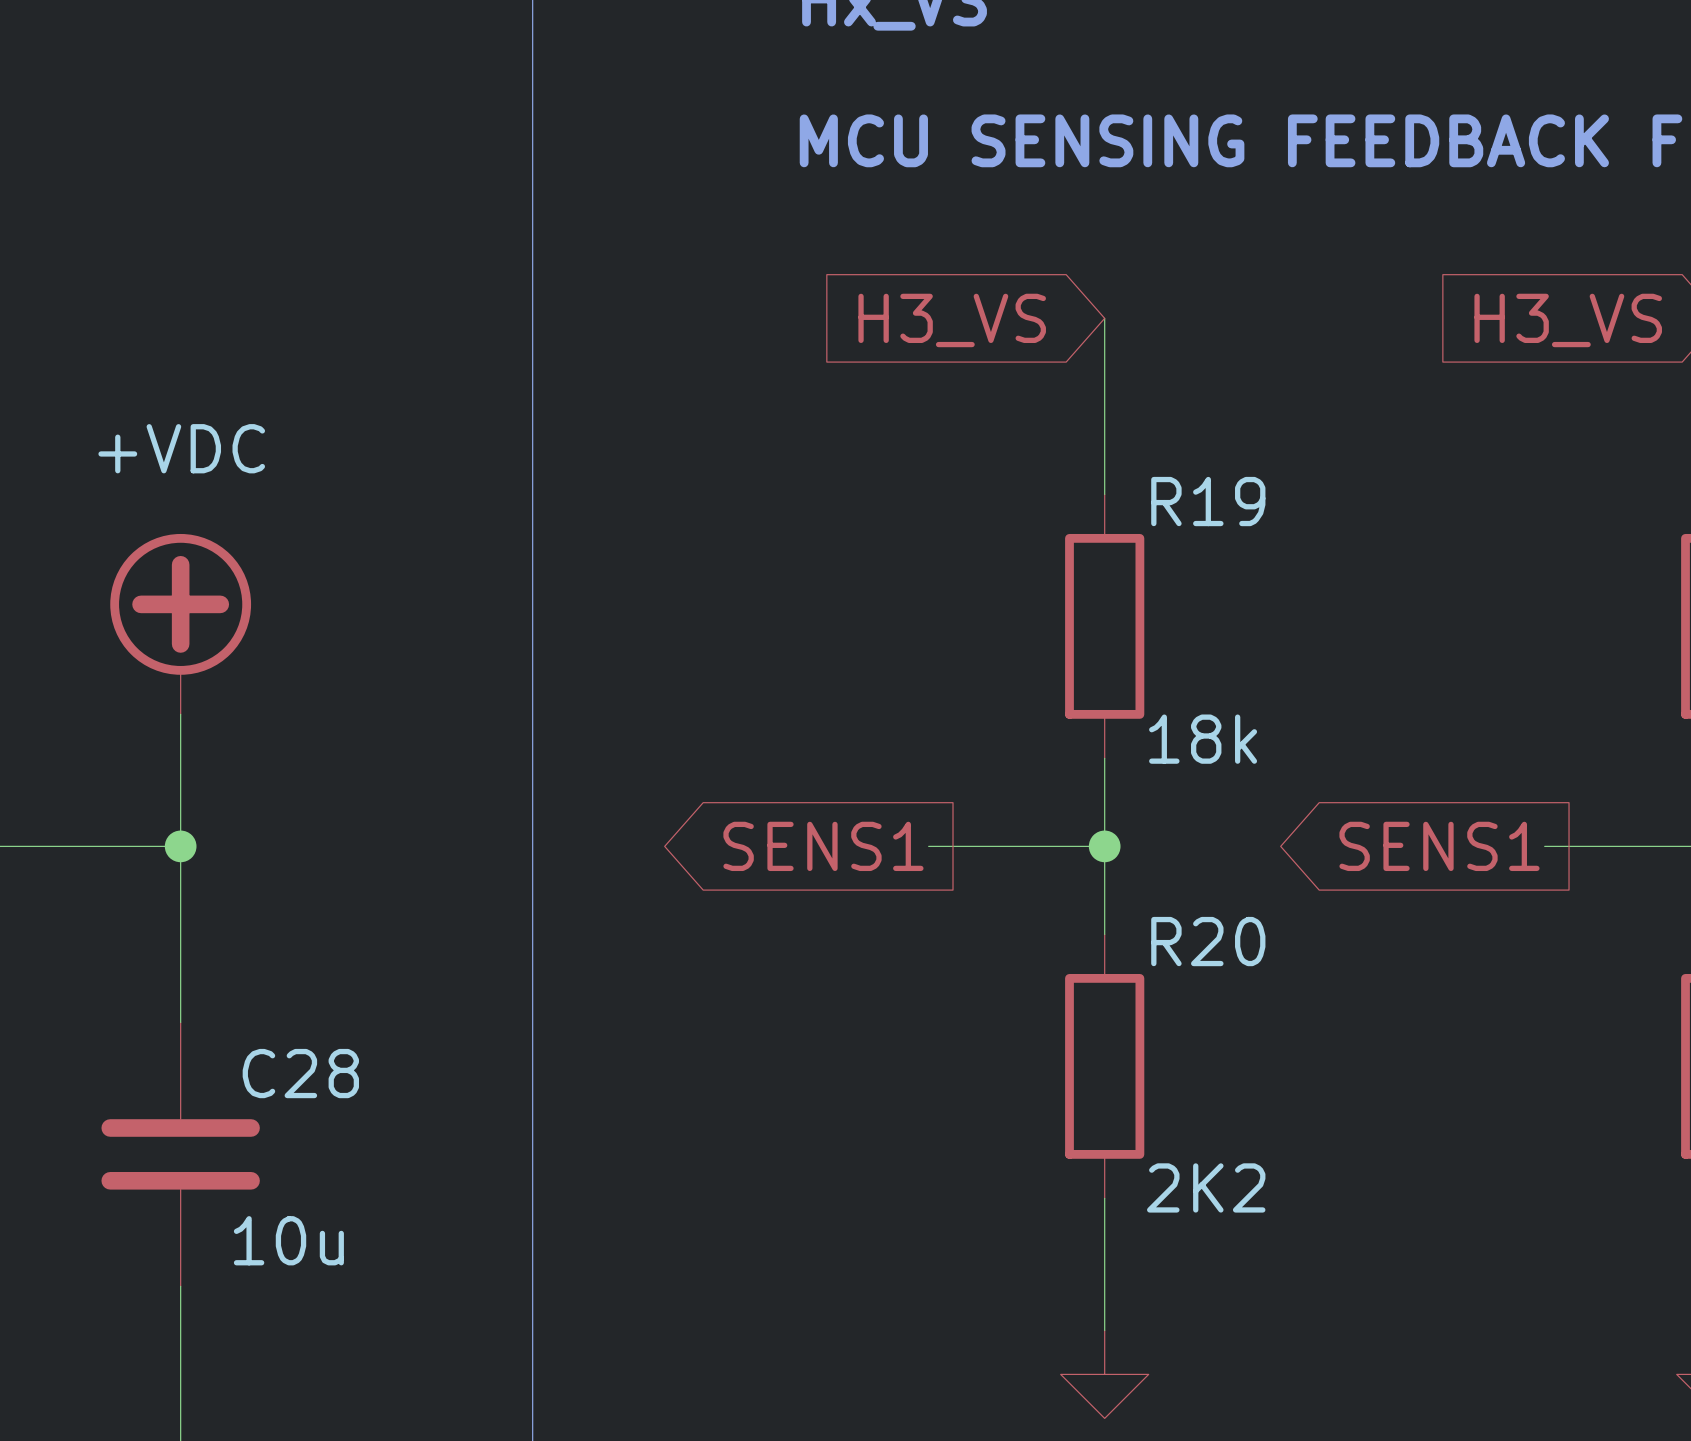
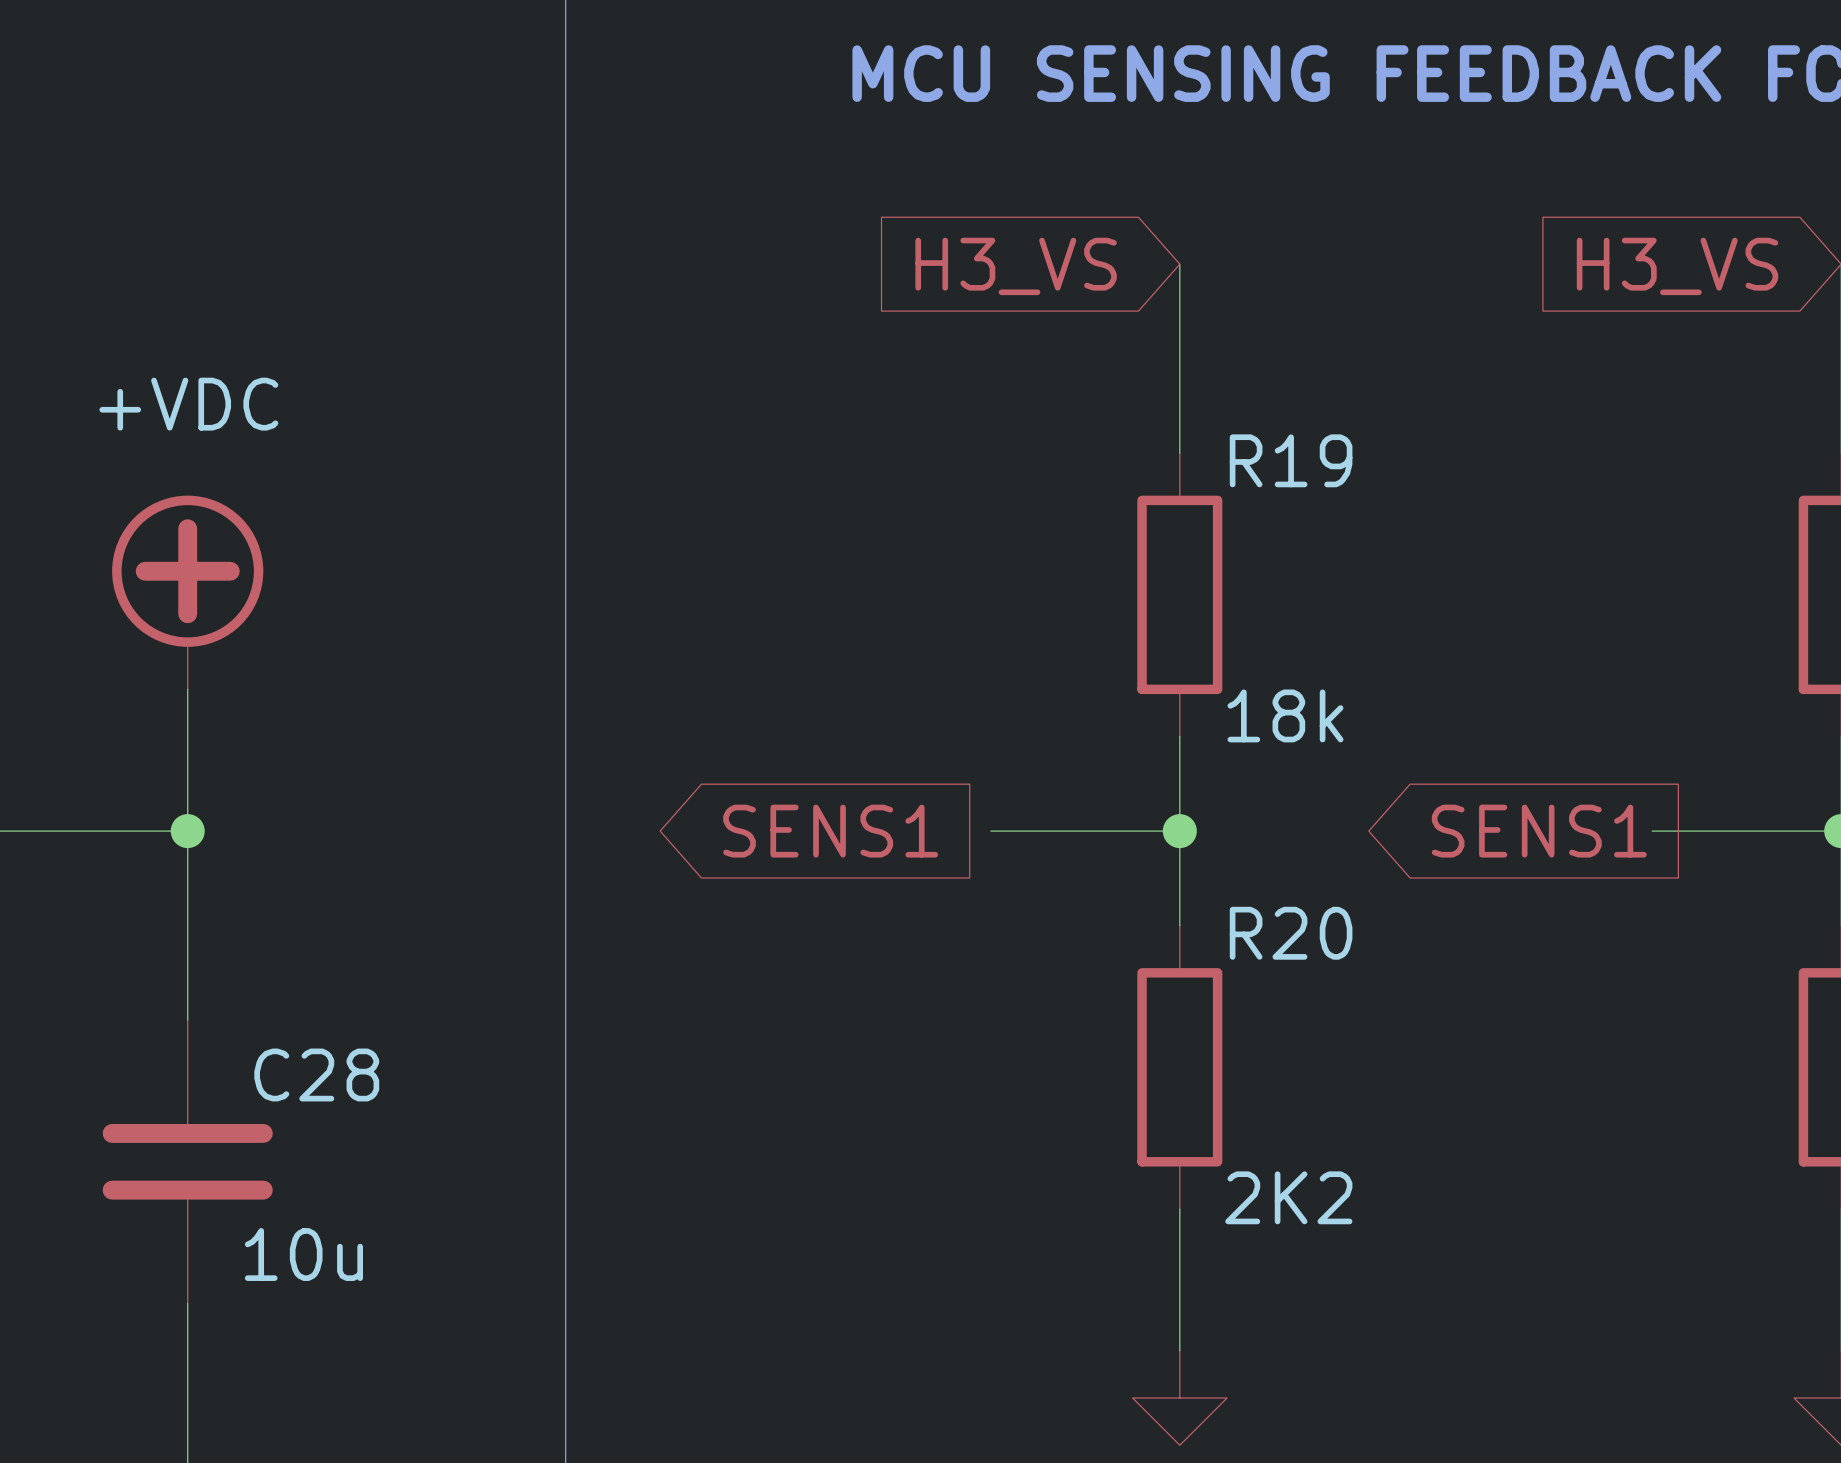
global label position: SENS1 (823, 846) -> SENS1 (830, 831)

